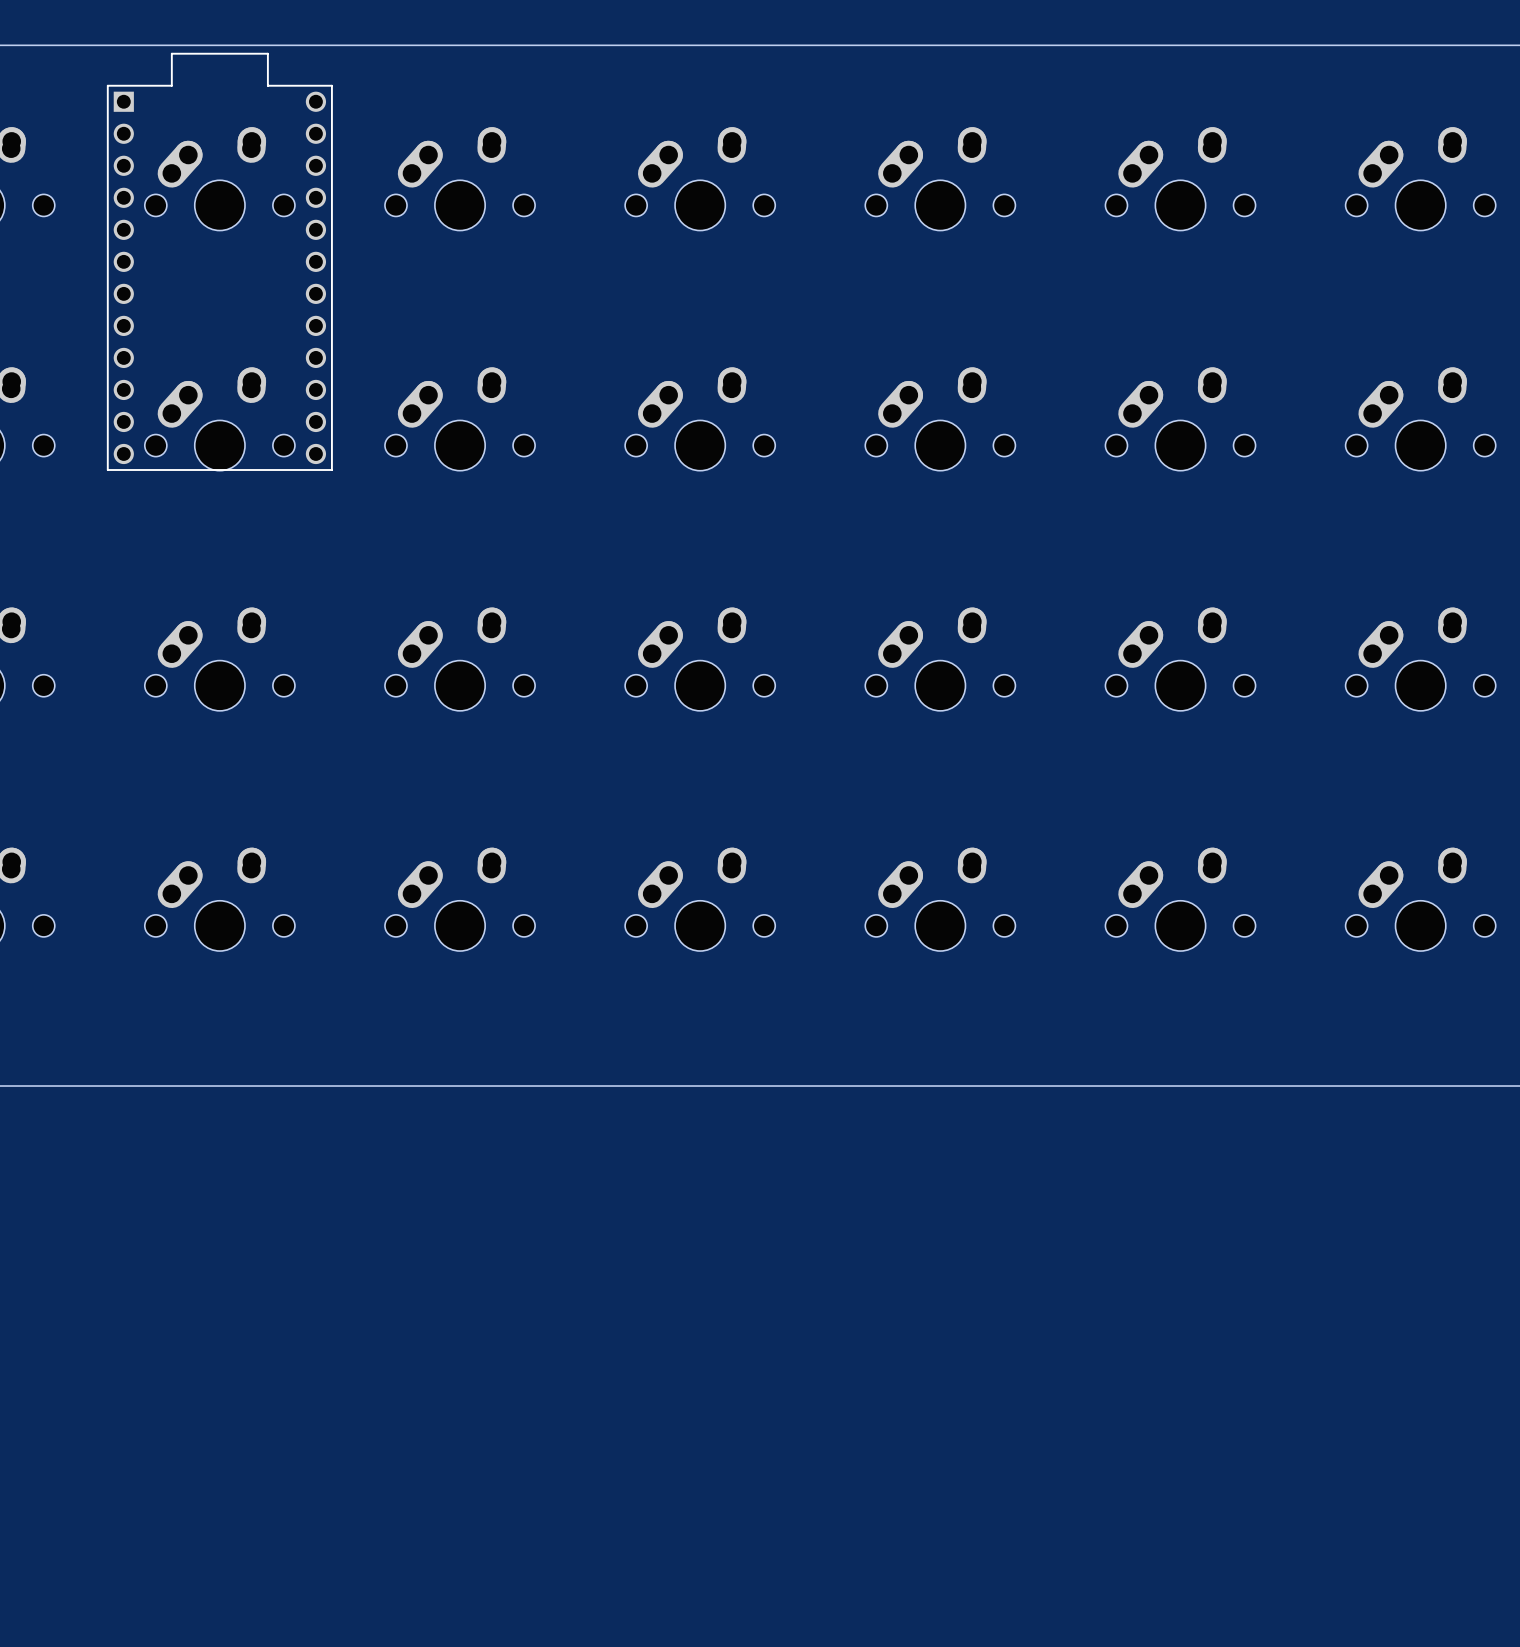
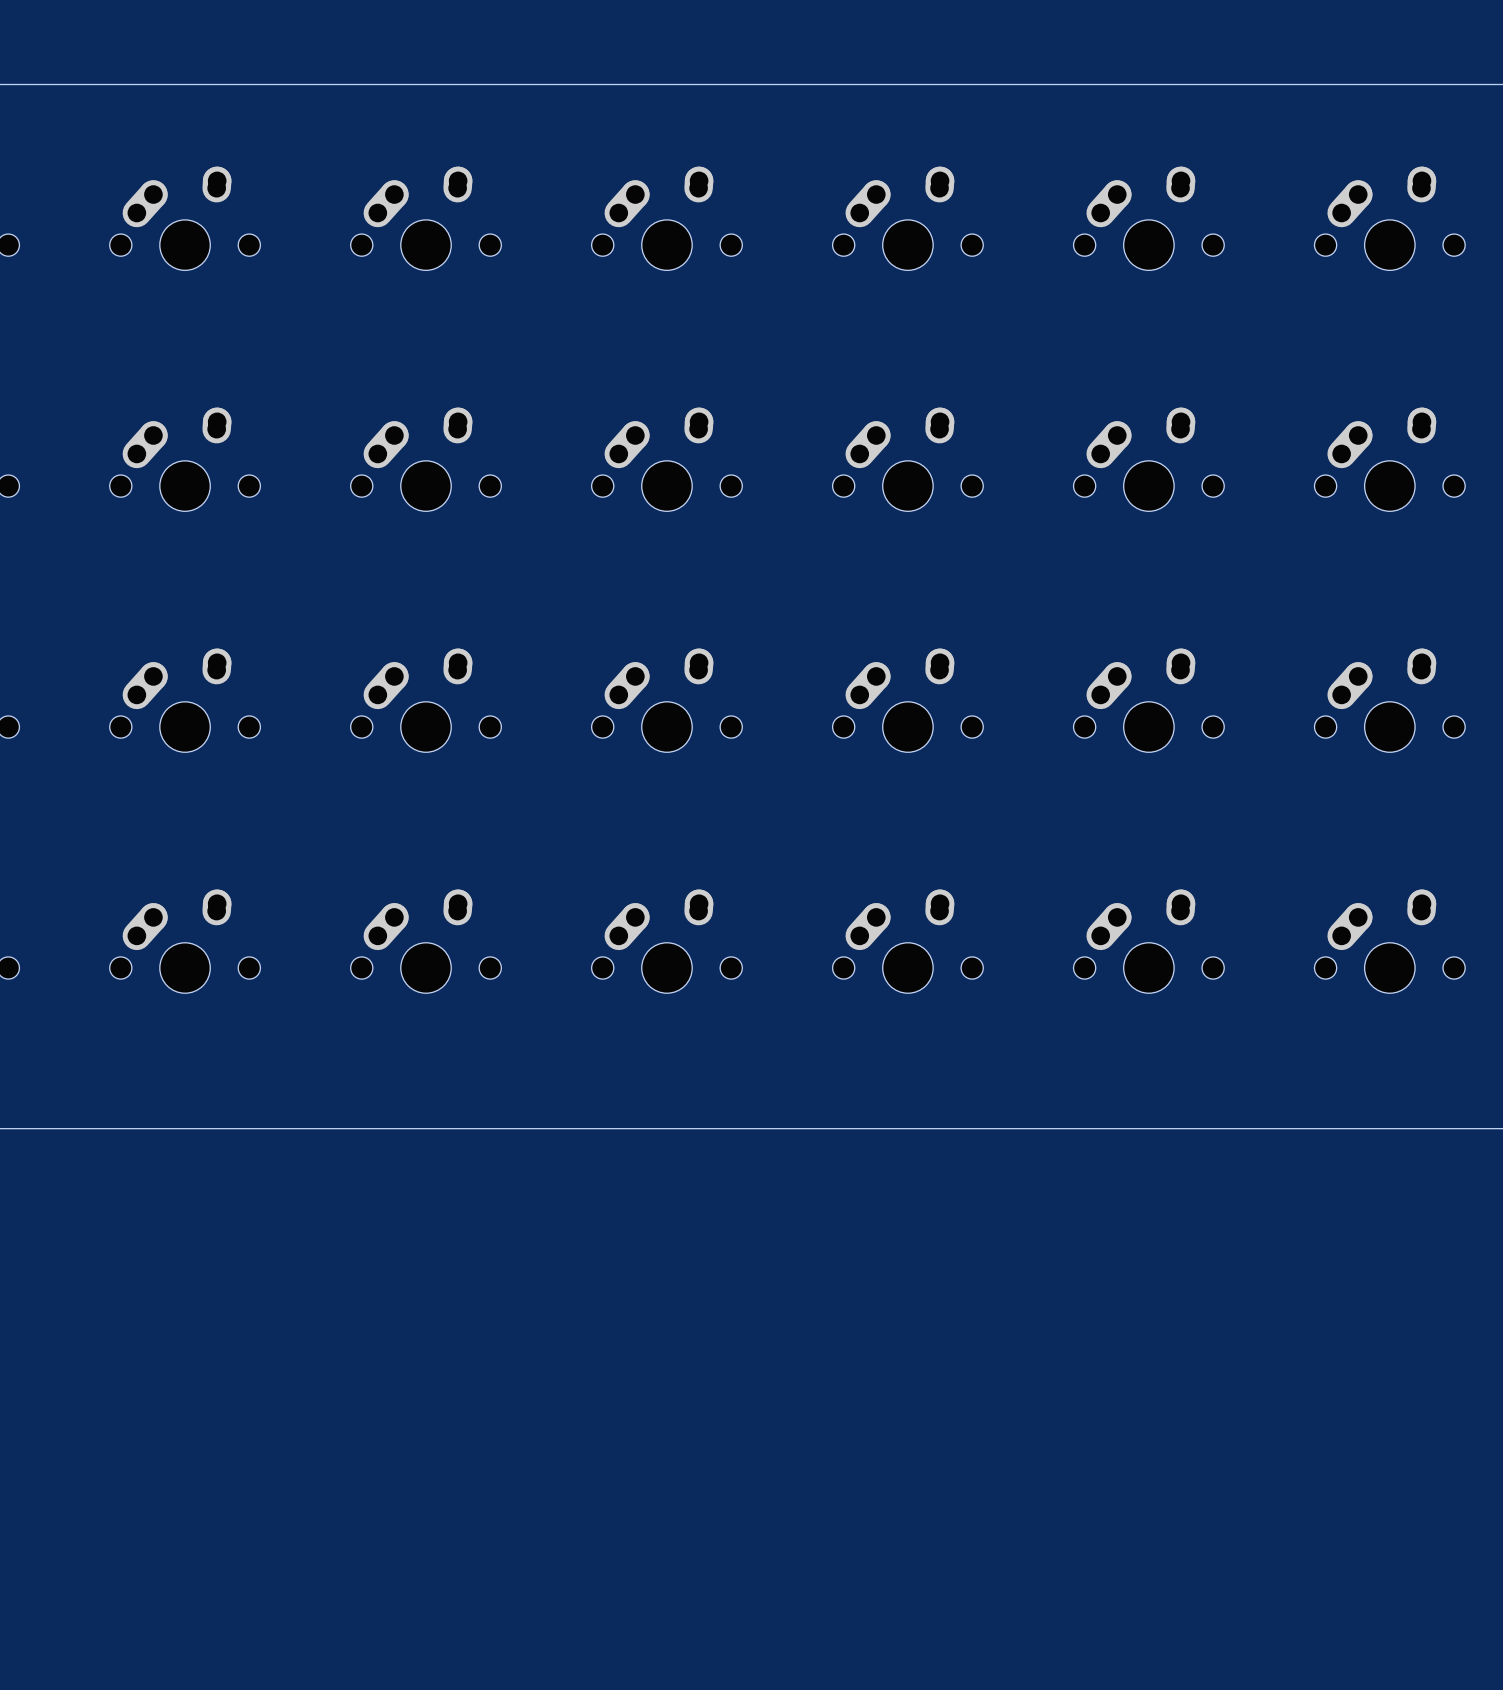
part: (219, 261) -> none

